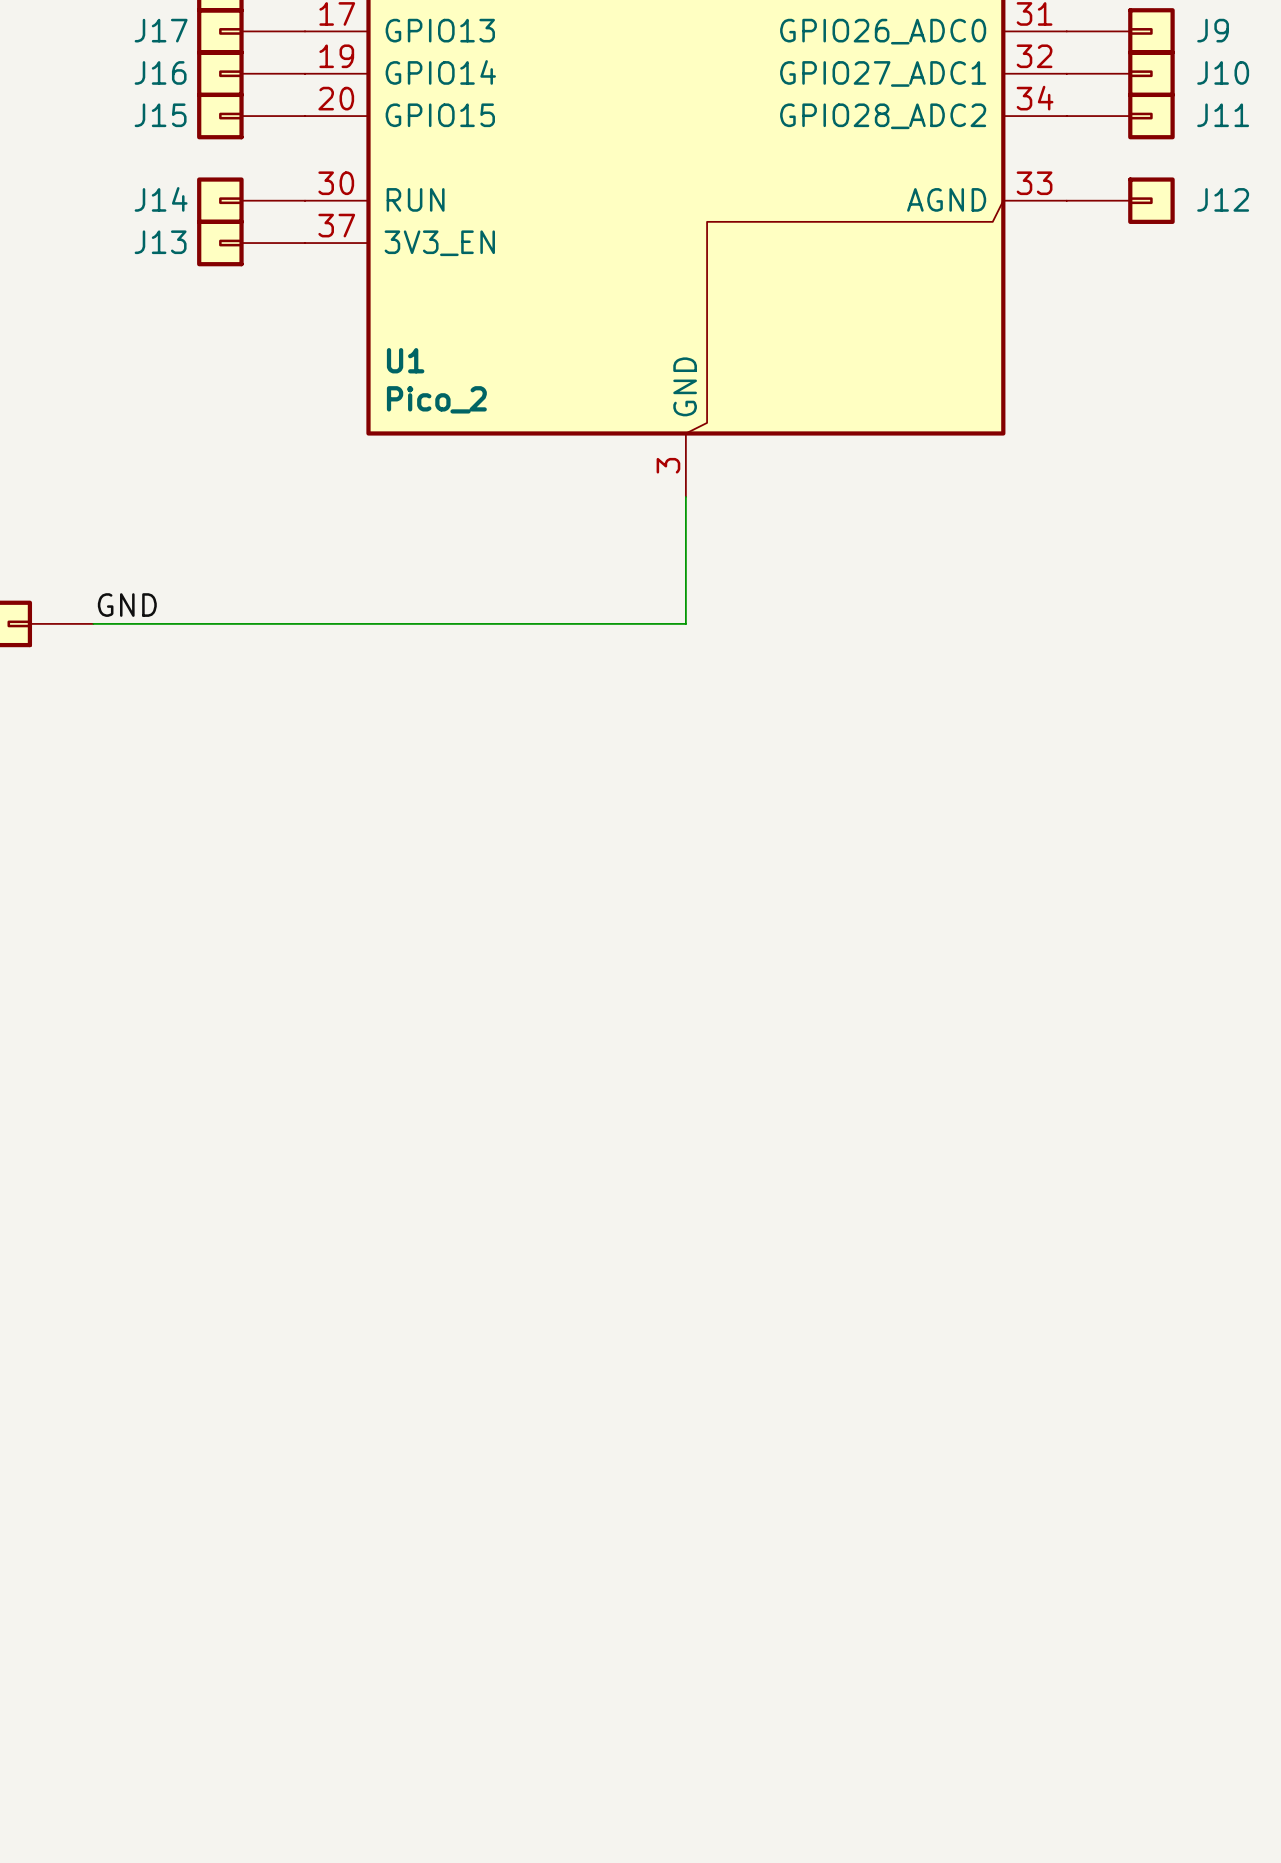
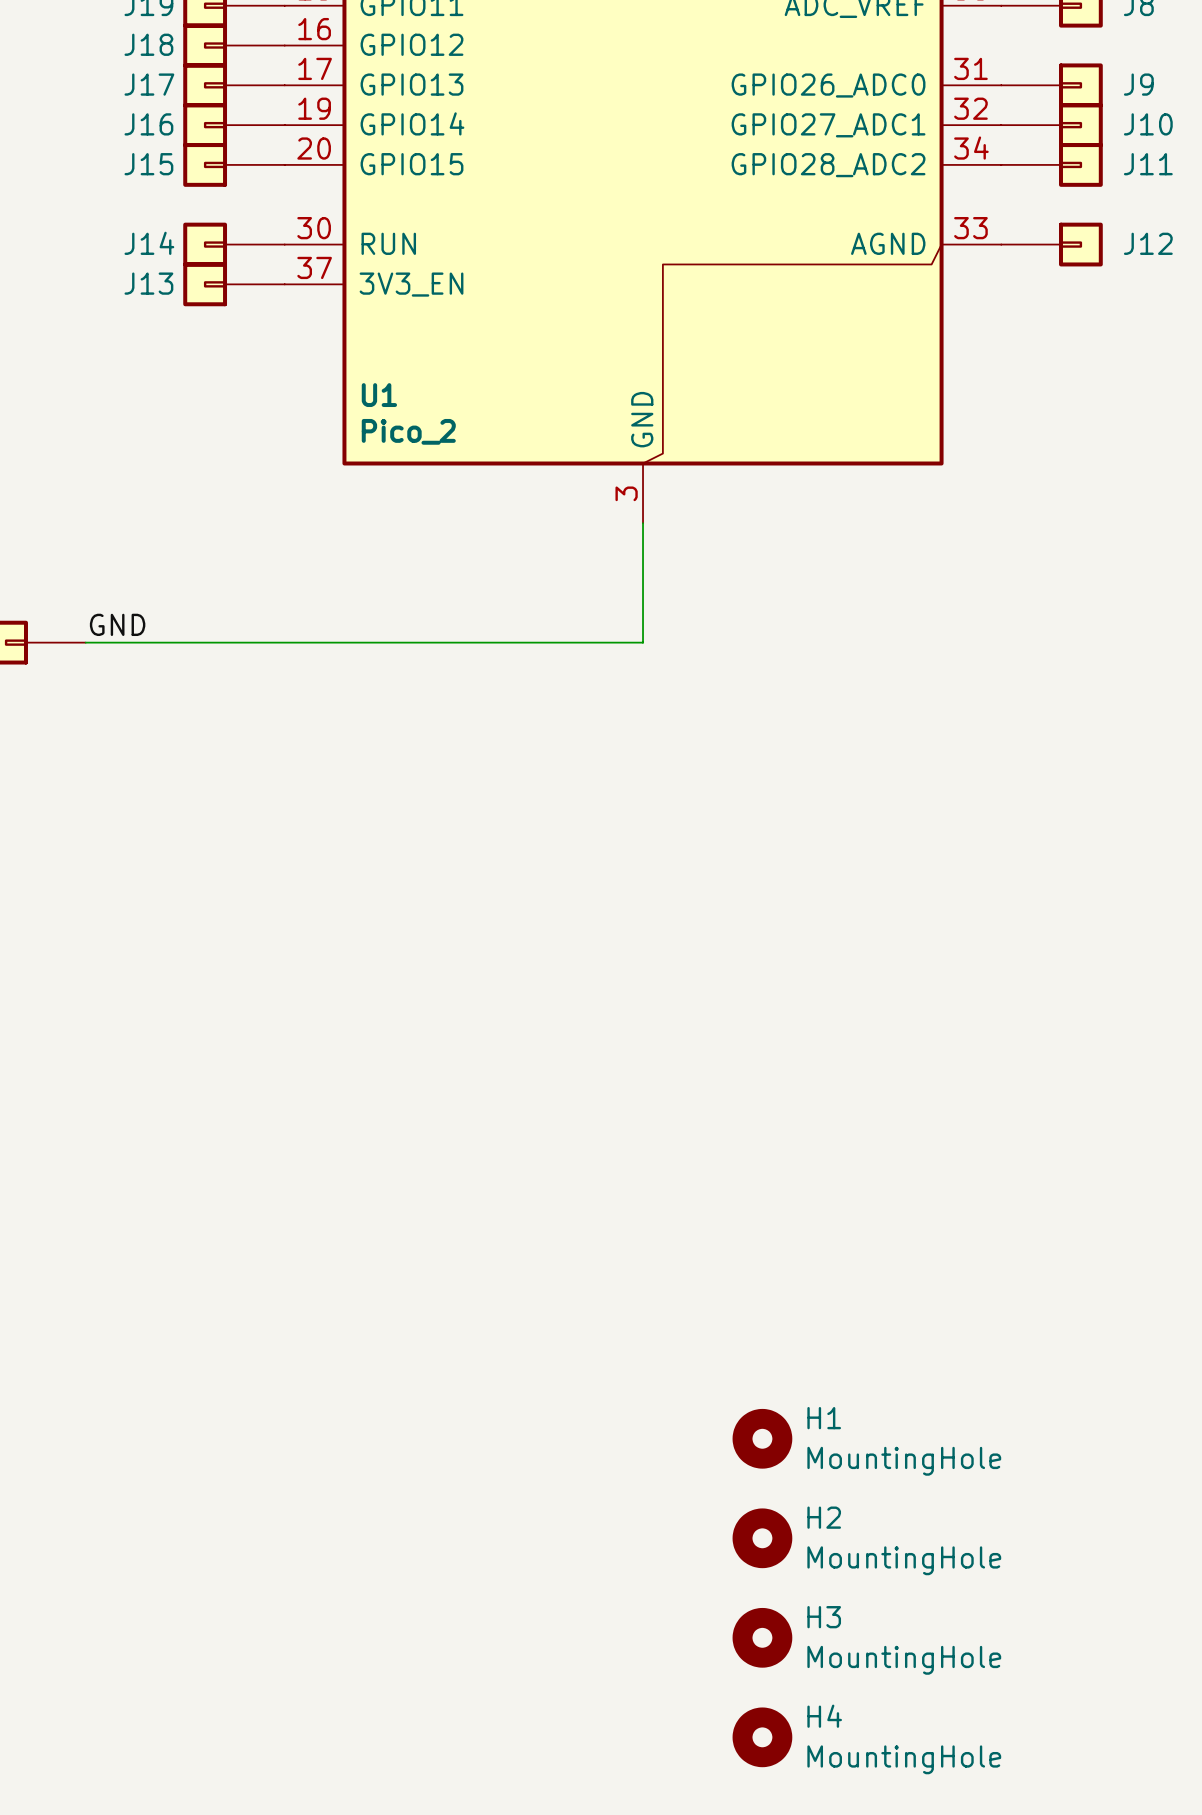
H1: none -> MountingHole (762, 1438)
H2: none -> MountingHole (762, 1538)
H3: none -> MountingHole (762, 1637)
H4: none -> MountingHole (762, 1737)

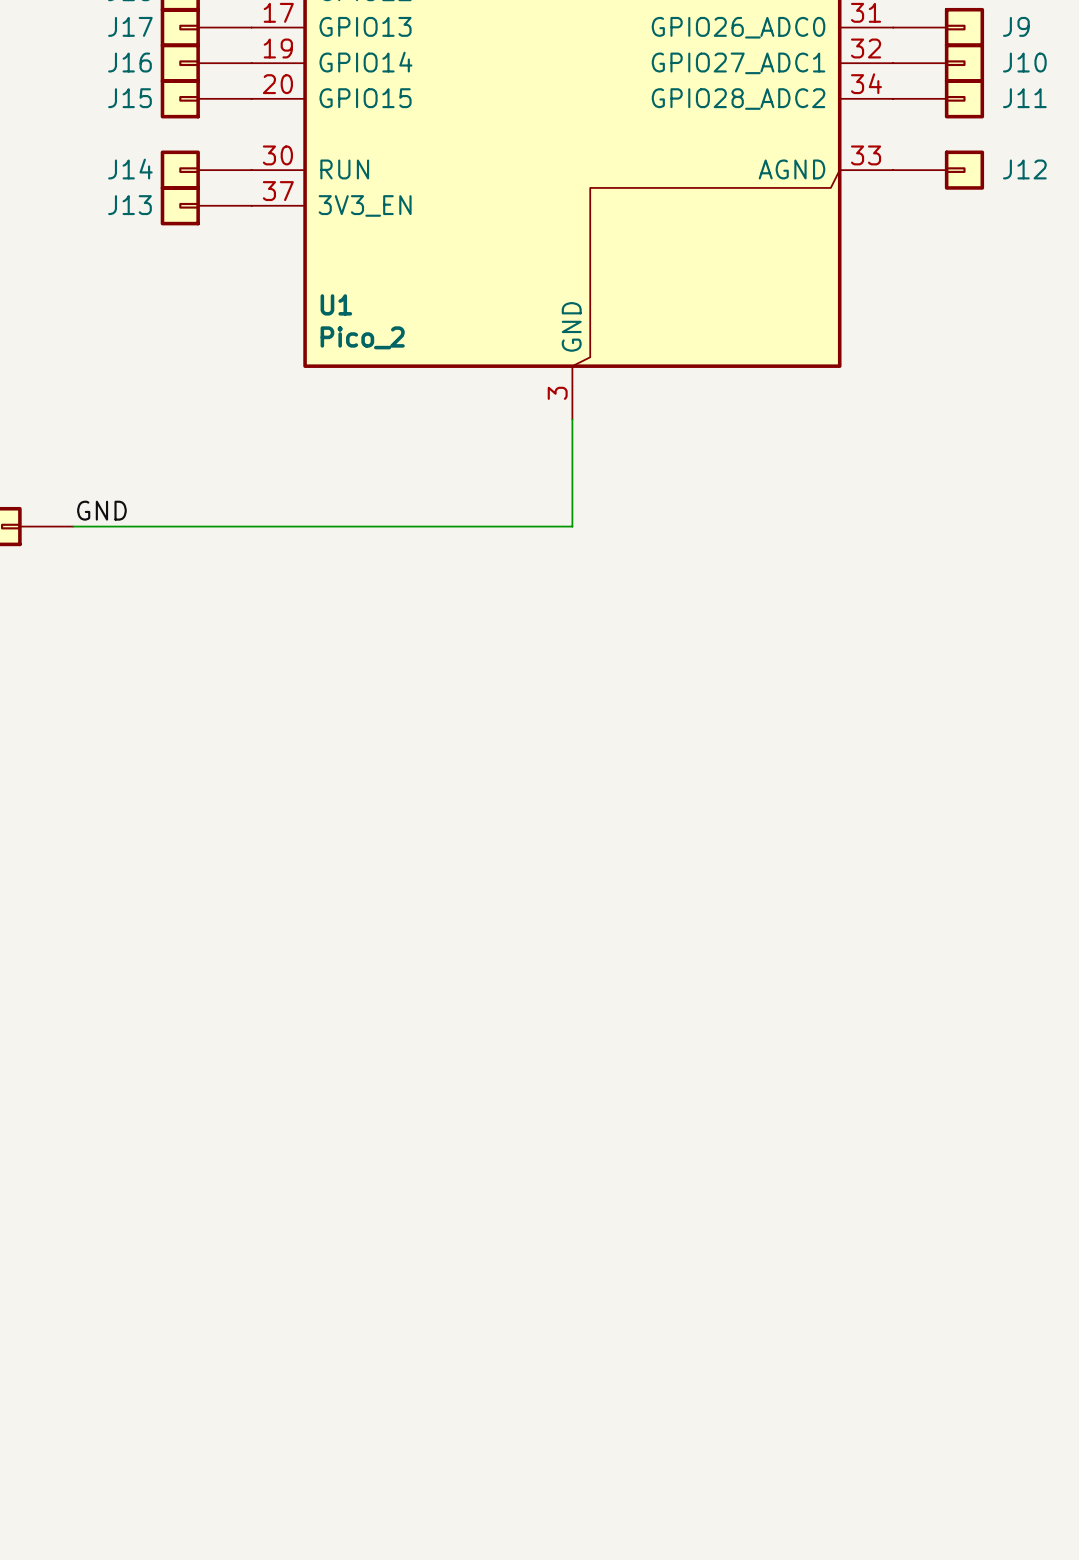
H1: MountingHole (762, 1438) -> none
H2: MountingHole (762, 1538) -> none
H3: MountingHole (762, 1637) -> none
H4: MountingHole (762, 1737) -> none

